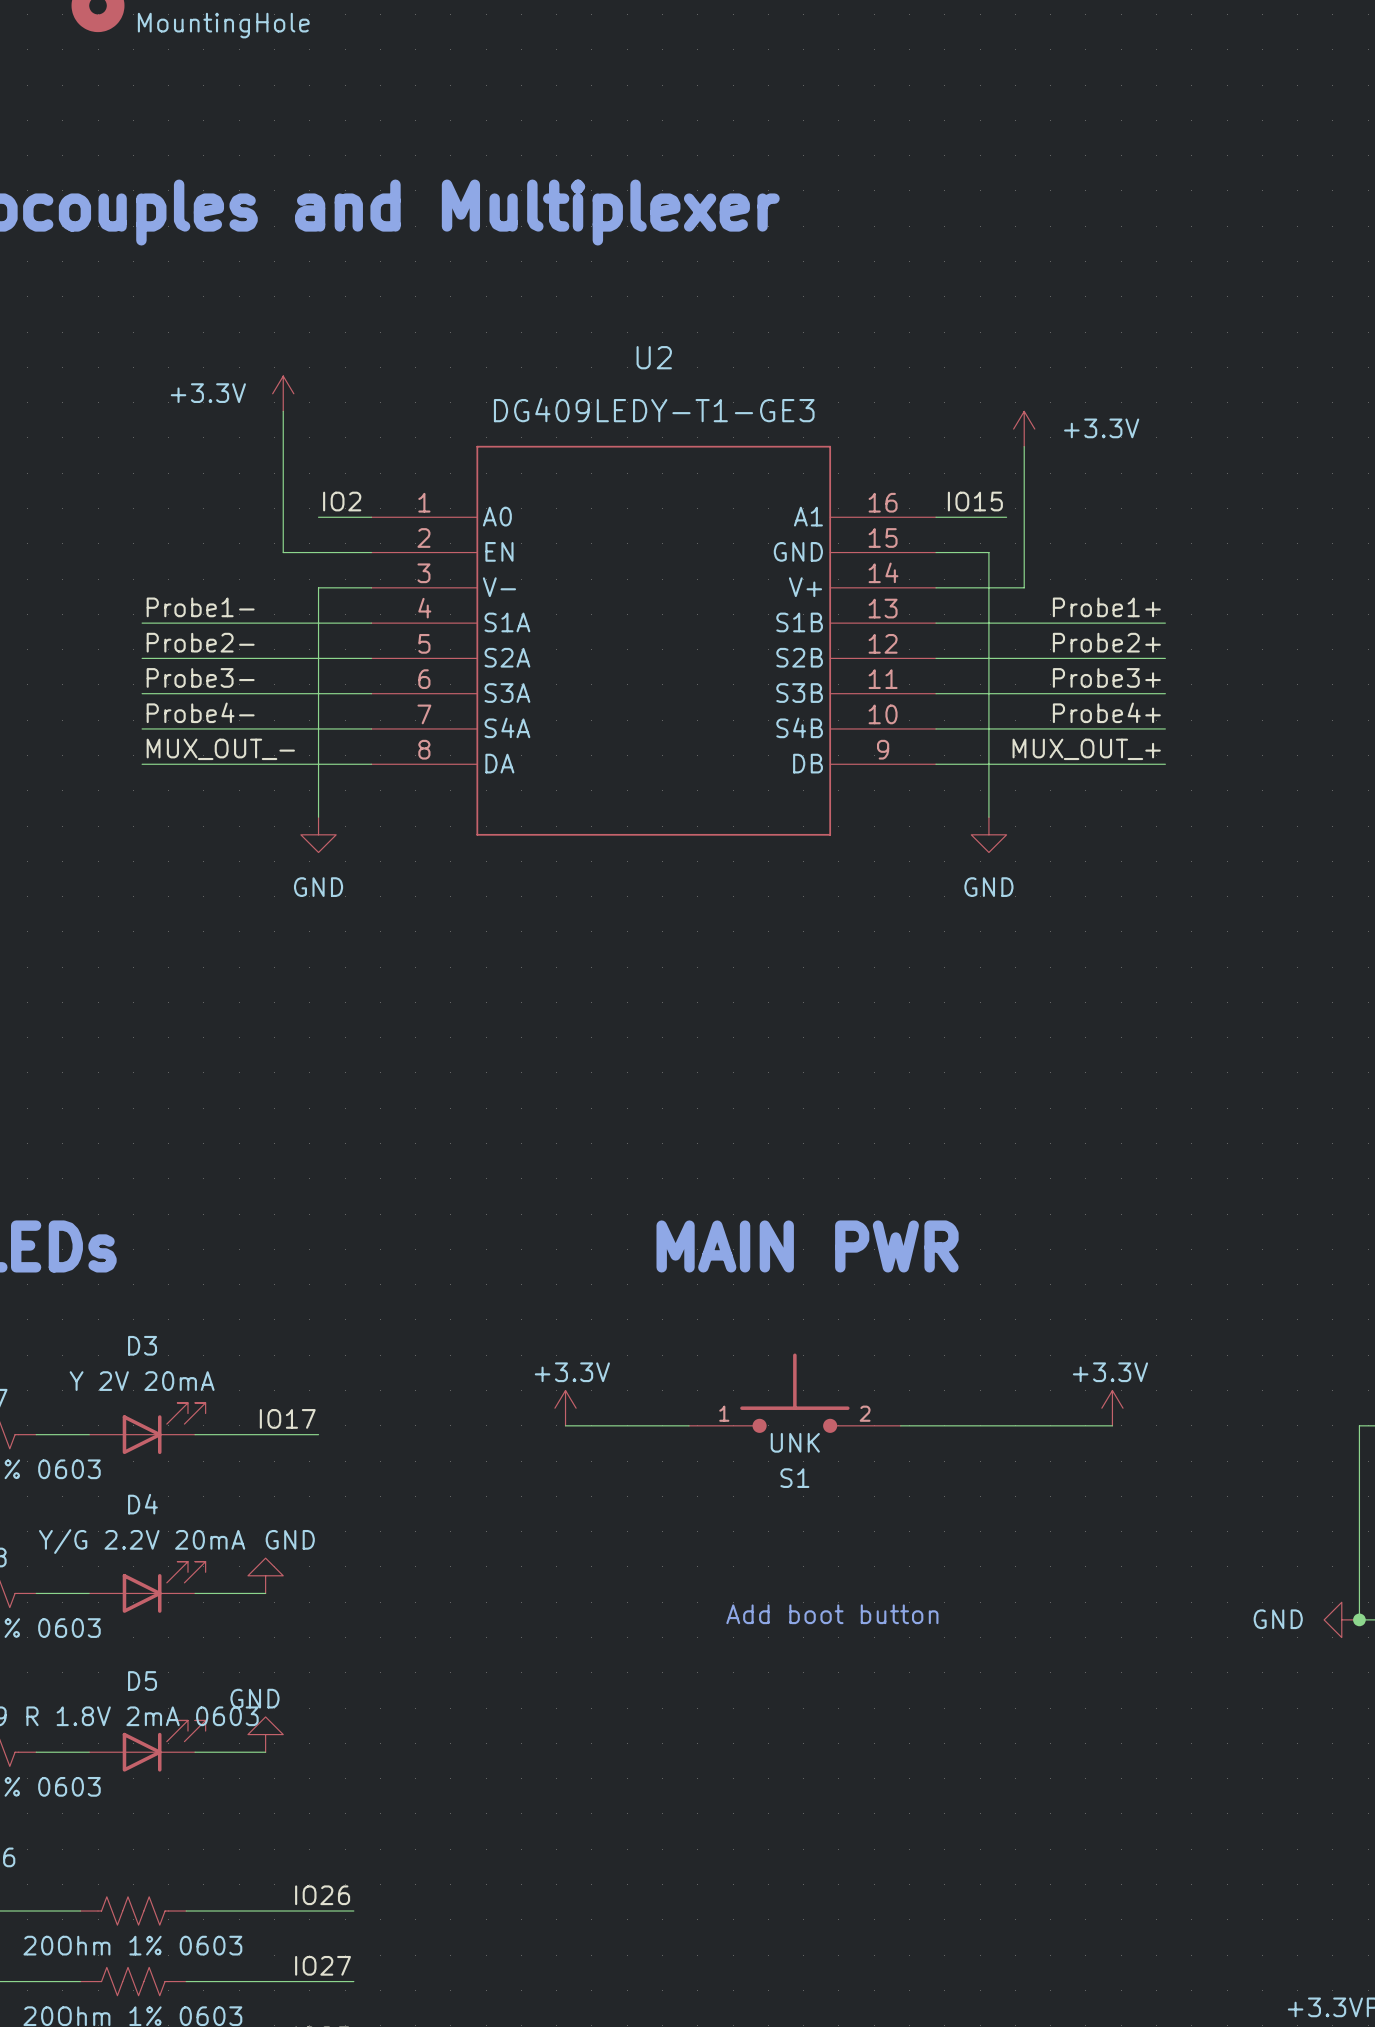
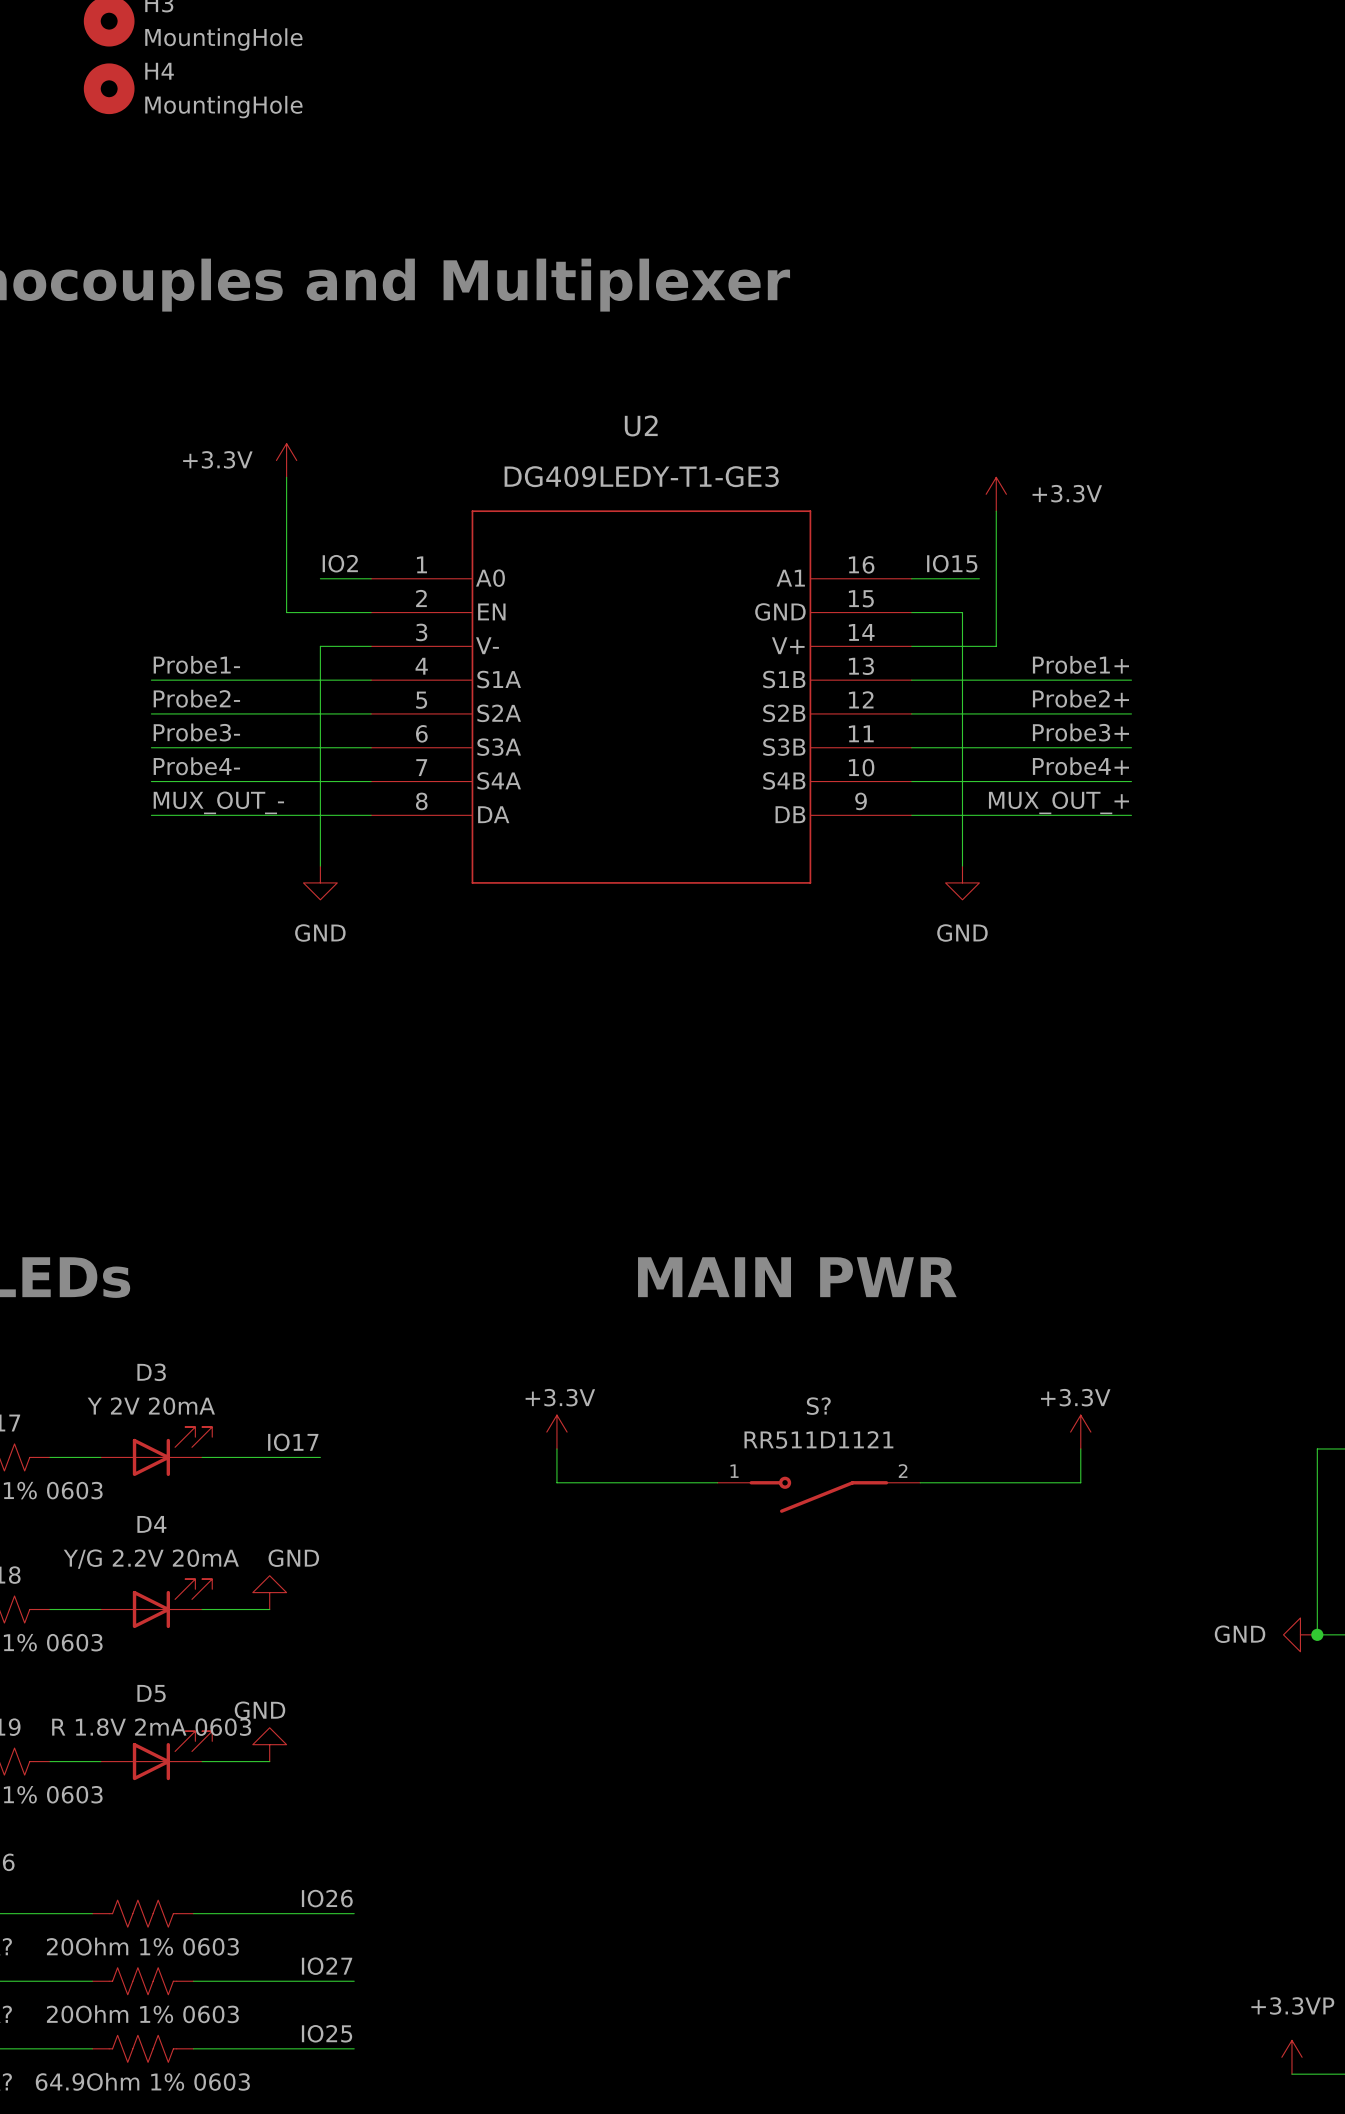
S1: UNK (794, 1393) -> none
wire: (565, 1425) (689, 1425) -> (556, 1448) (556, 1482) (717, 1482)
wire: (900, 1425) (1112, 1425) -> (920, 1482) (1080, 1482) (1080, 1448)
S?: none -> RR511D1121 (818, 1494)
text: Add boot button (832, 1614) -> none

